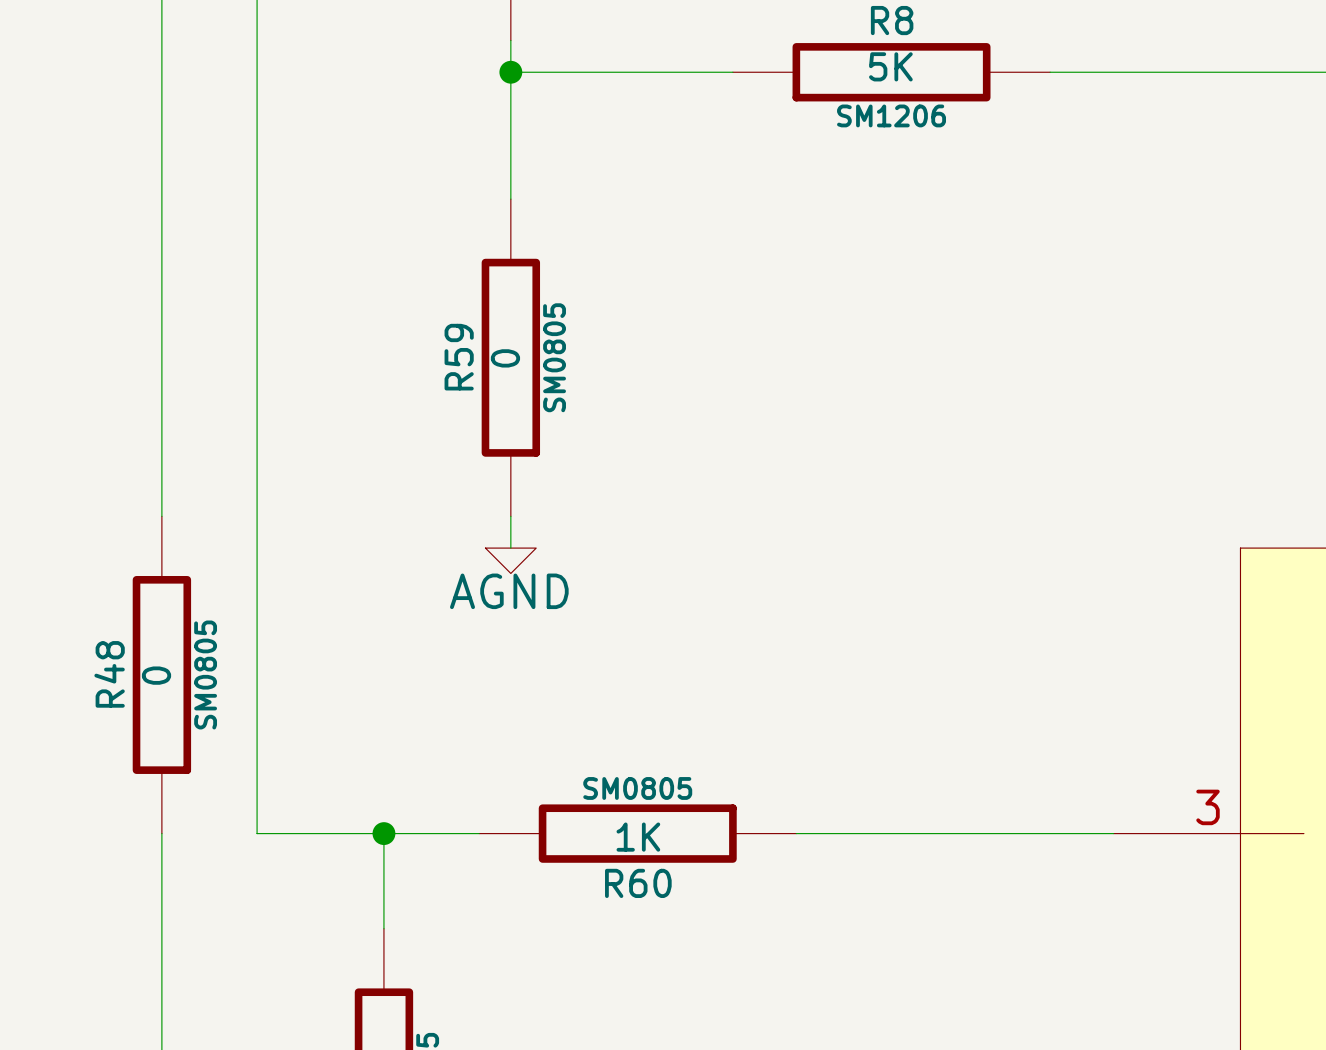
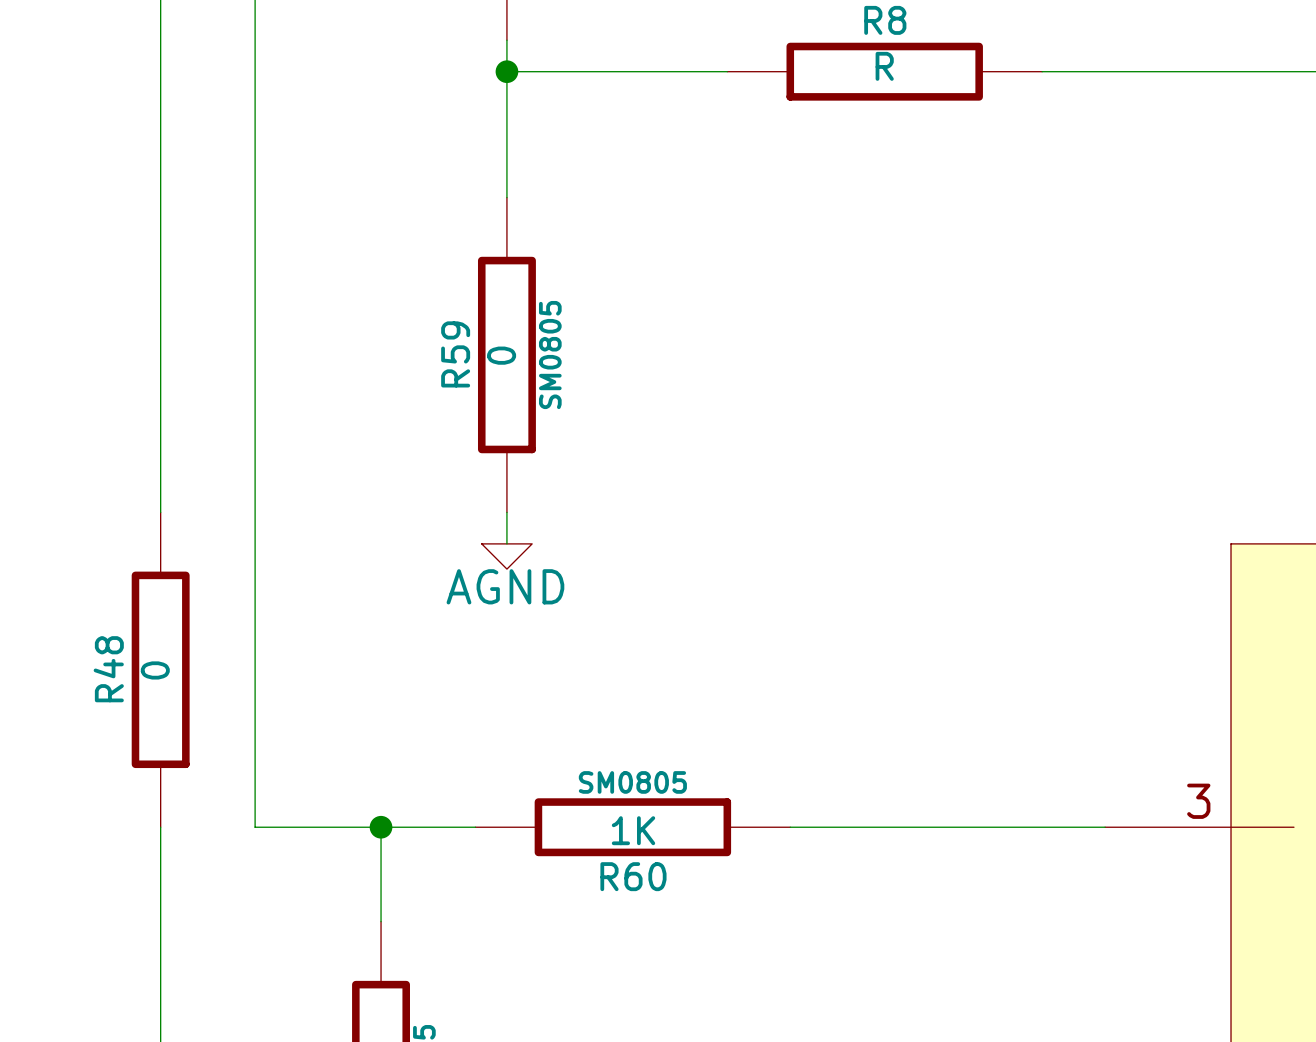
R8 value: 5K (890, 66) -> R (884, 66)
R8 text: SM1206 (891, 115) -> none
R48 text: SM0805 (205, 674) -> none

